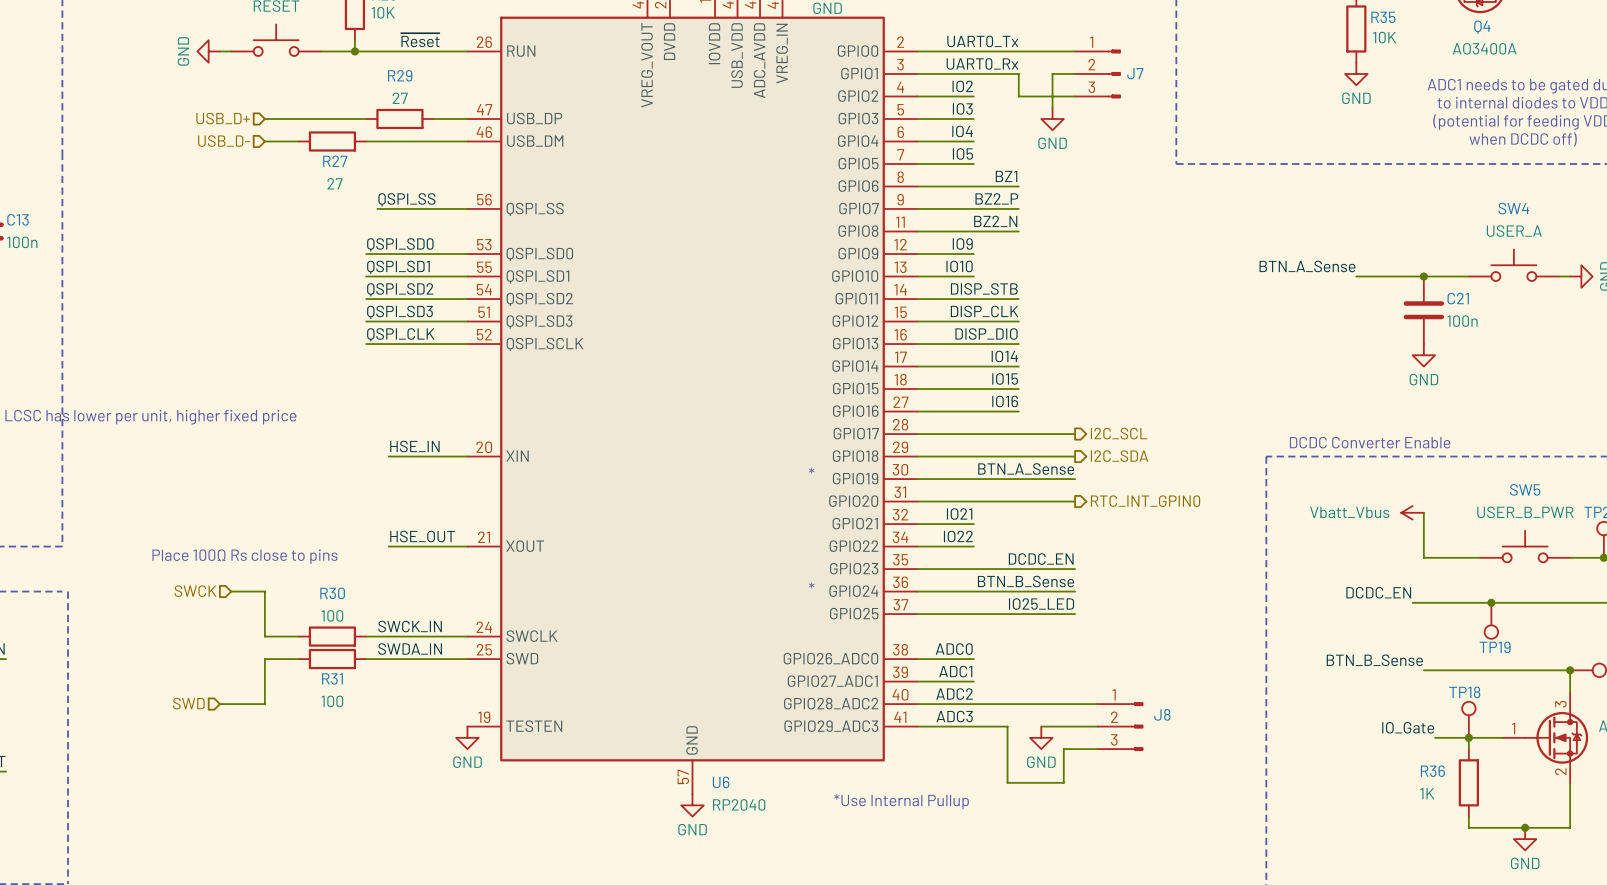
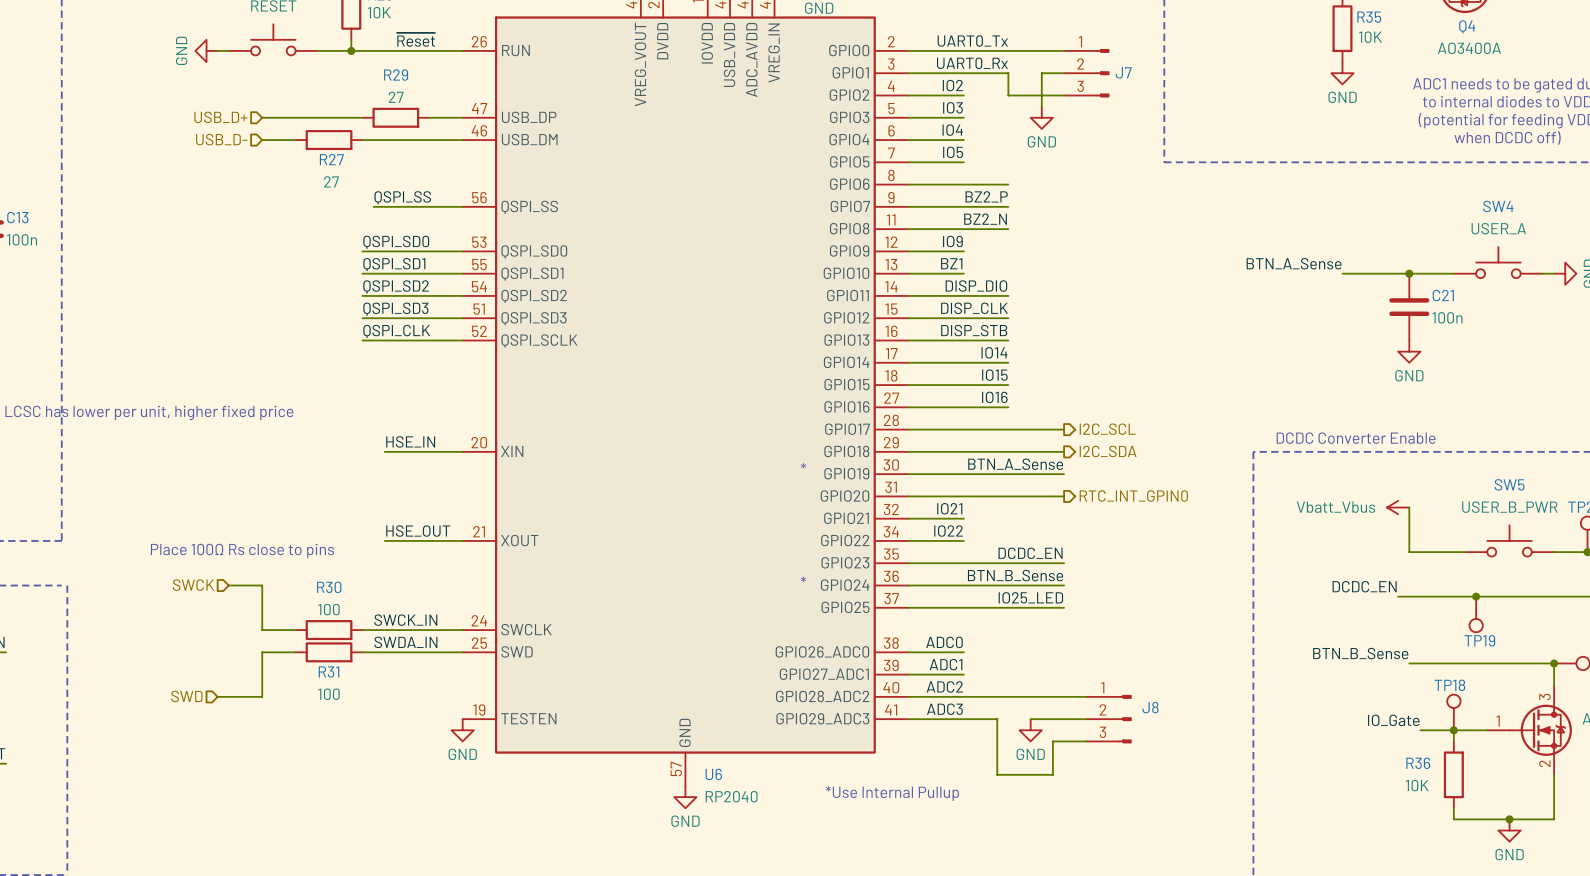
label: BZ1 (1006, 176) -> none
label: IO10 (959, 266) -> BZ1 (951, 263)
label: DISP_STB (984, 288) -> DISP_DIO (976, 286)
label: DISP_DIO (986, 333) -> DISP_STB (974, 330)
R36 value: 1K (1427, 793) -> 10K (1417, 785)

